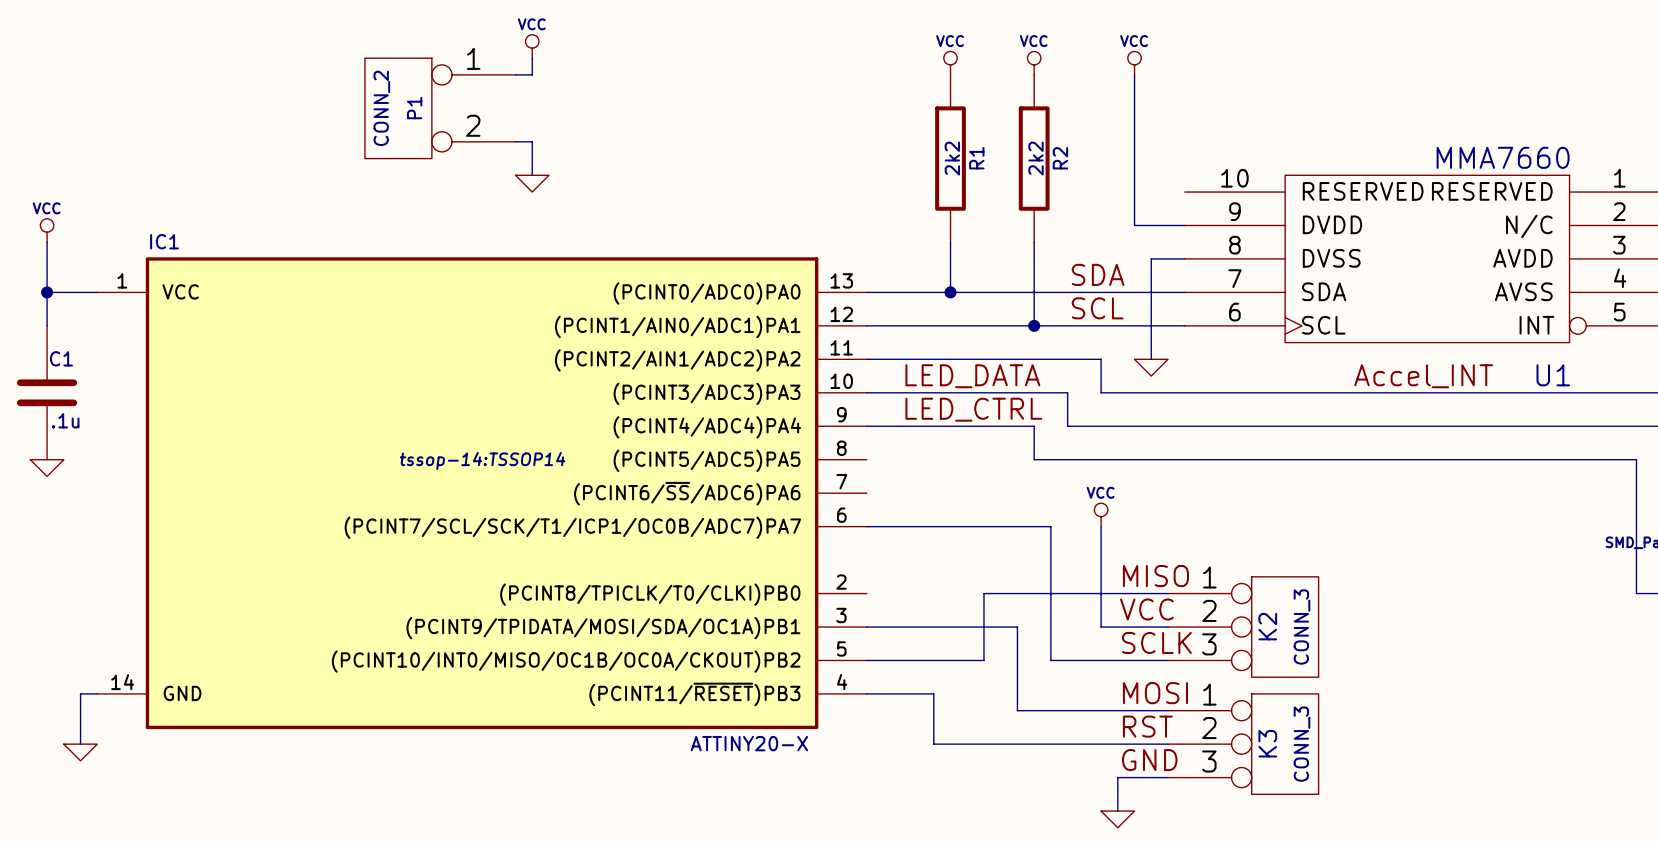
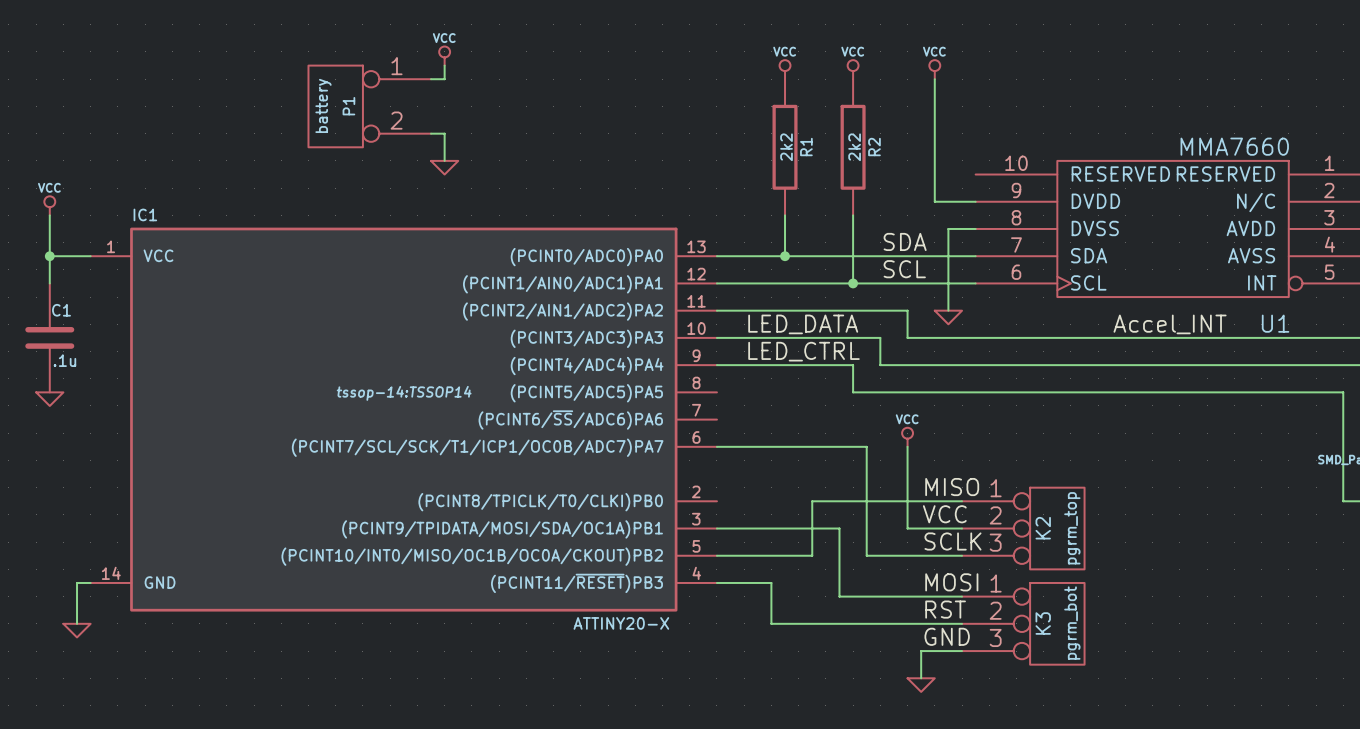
P1 value: CONN_2 (381, 108) -> battery (323, 105)
K2 value: CONN_3 (1301, 627) -> pgrm_top (1072, 528)
K3 value: CONN_3 (1301, 744) -> pgrm_bot (1072, 623)

